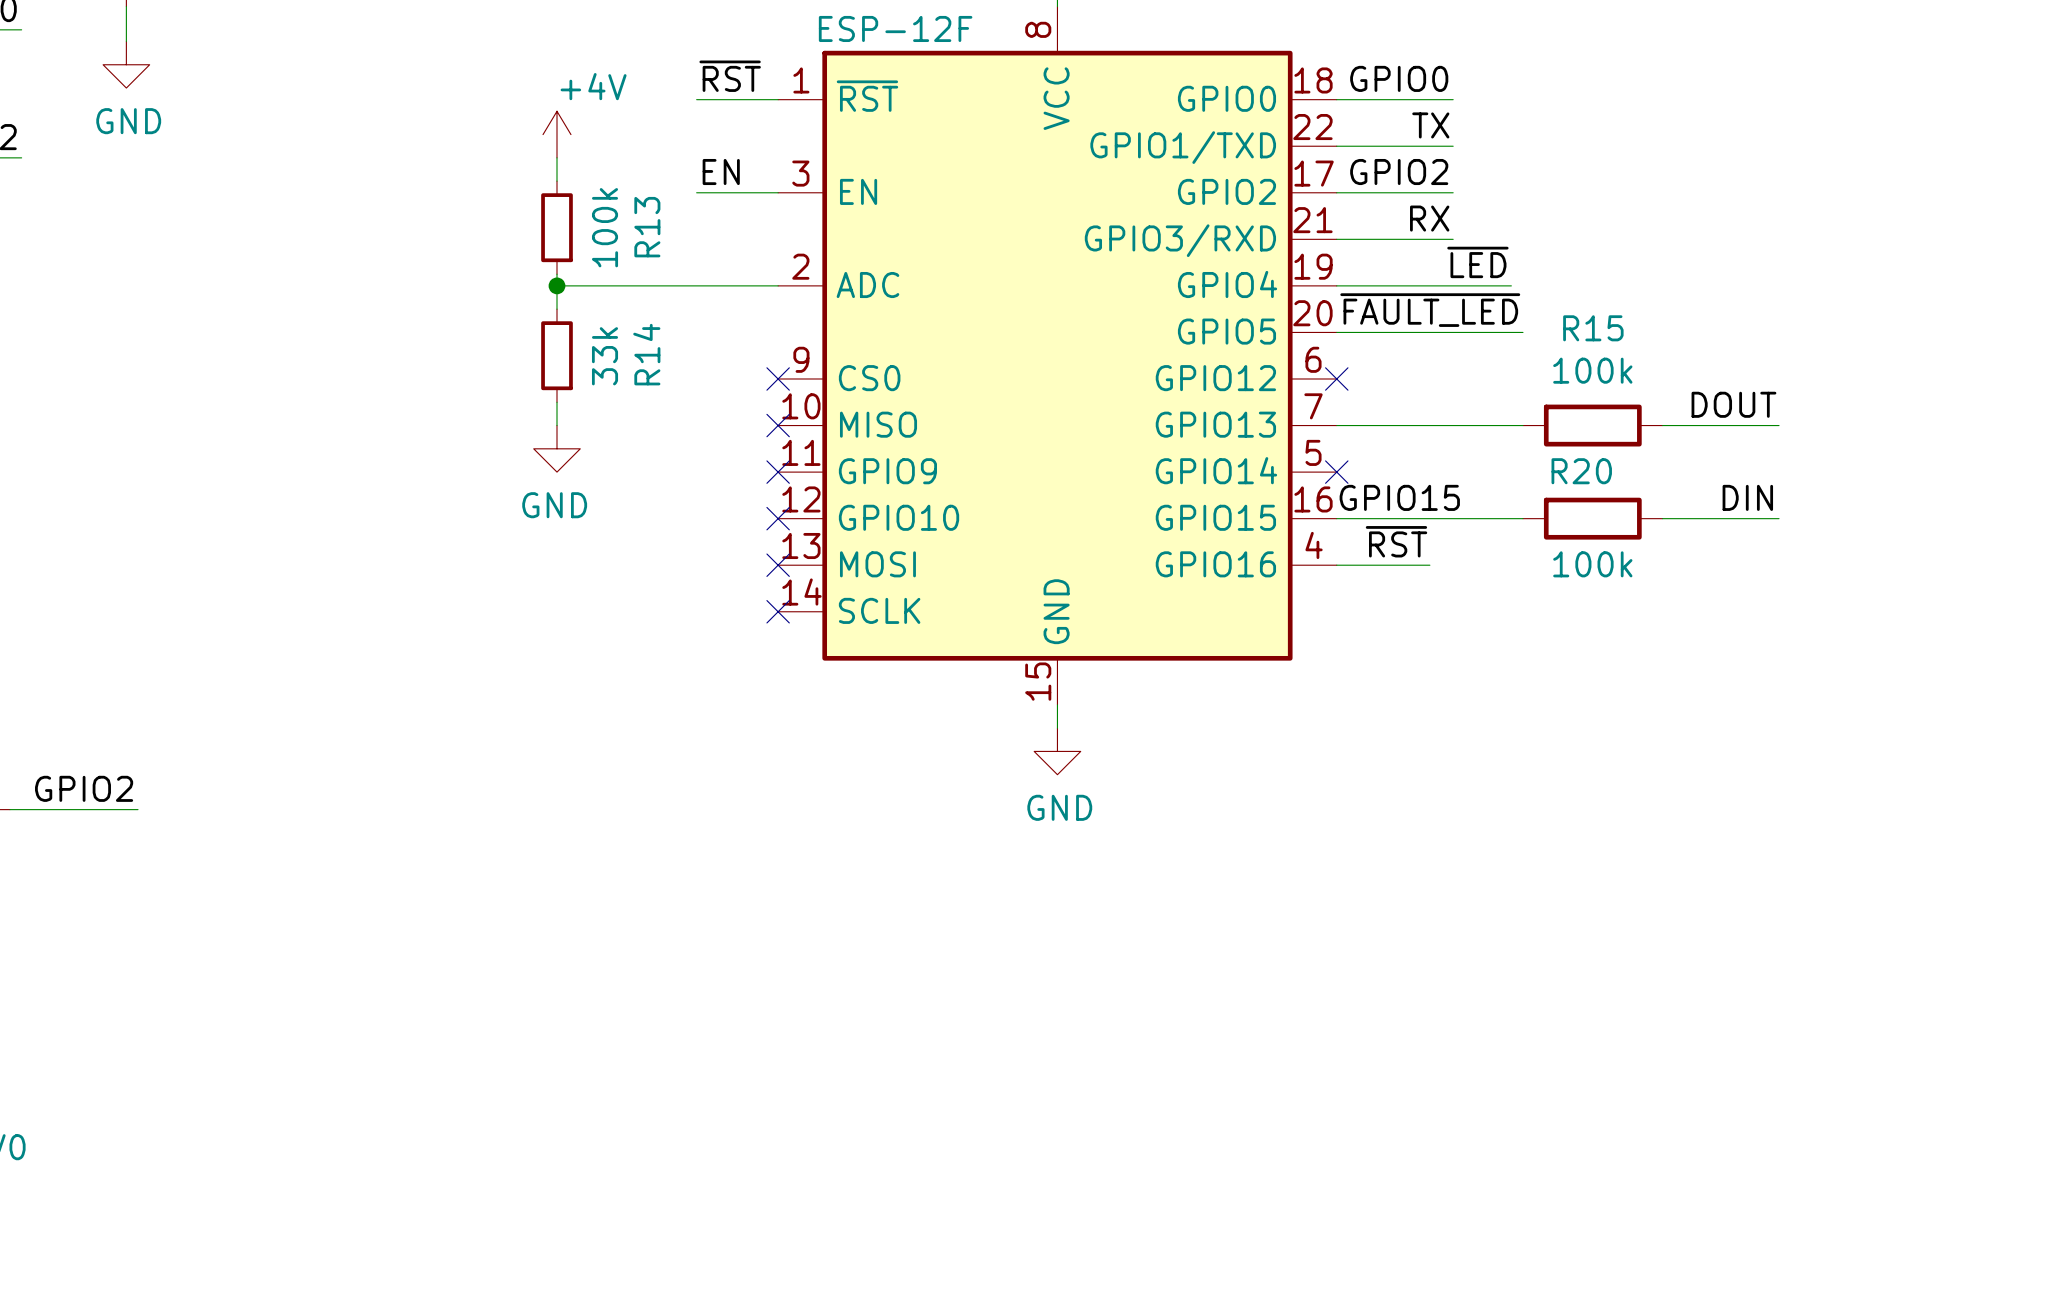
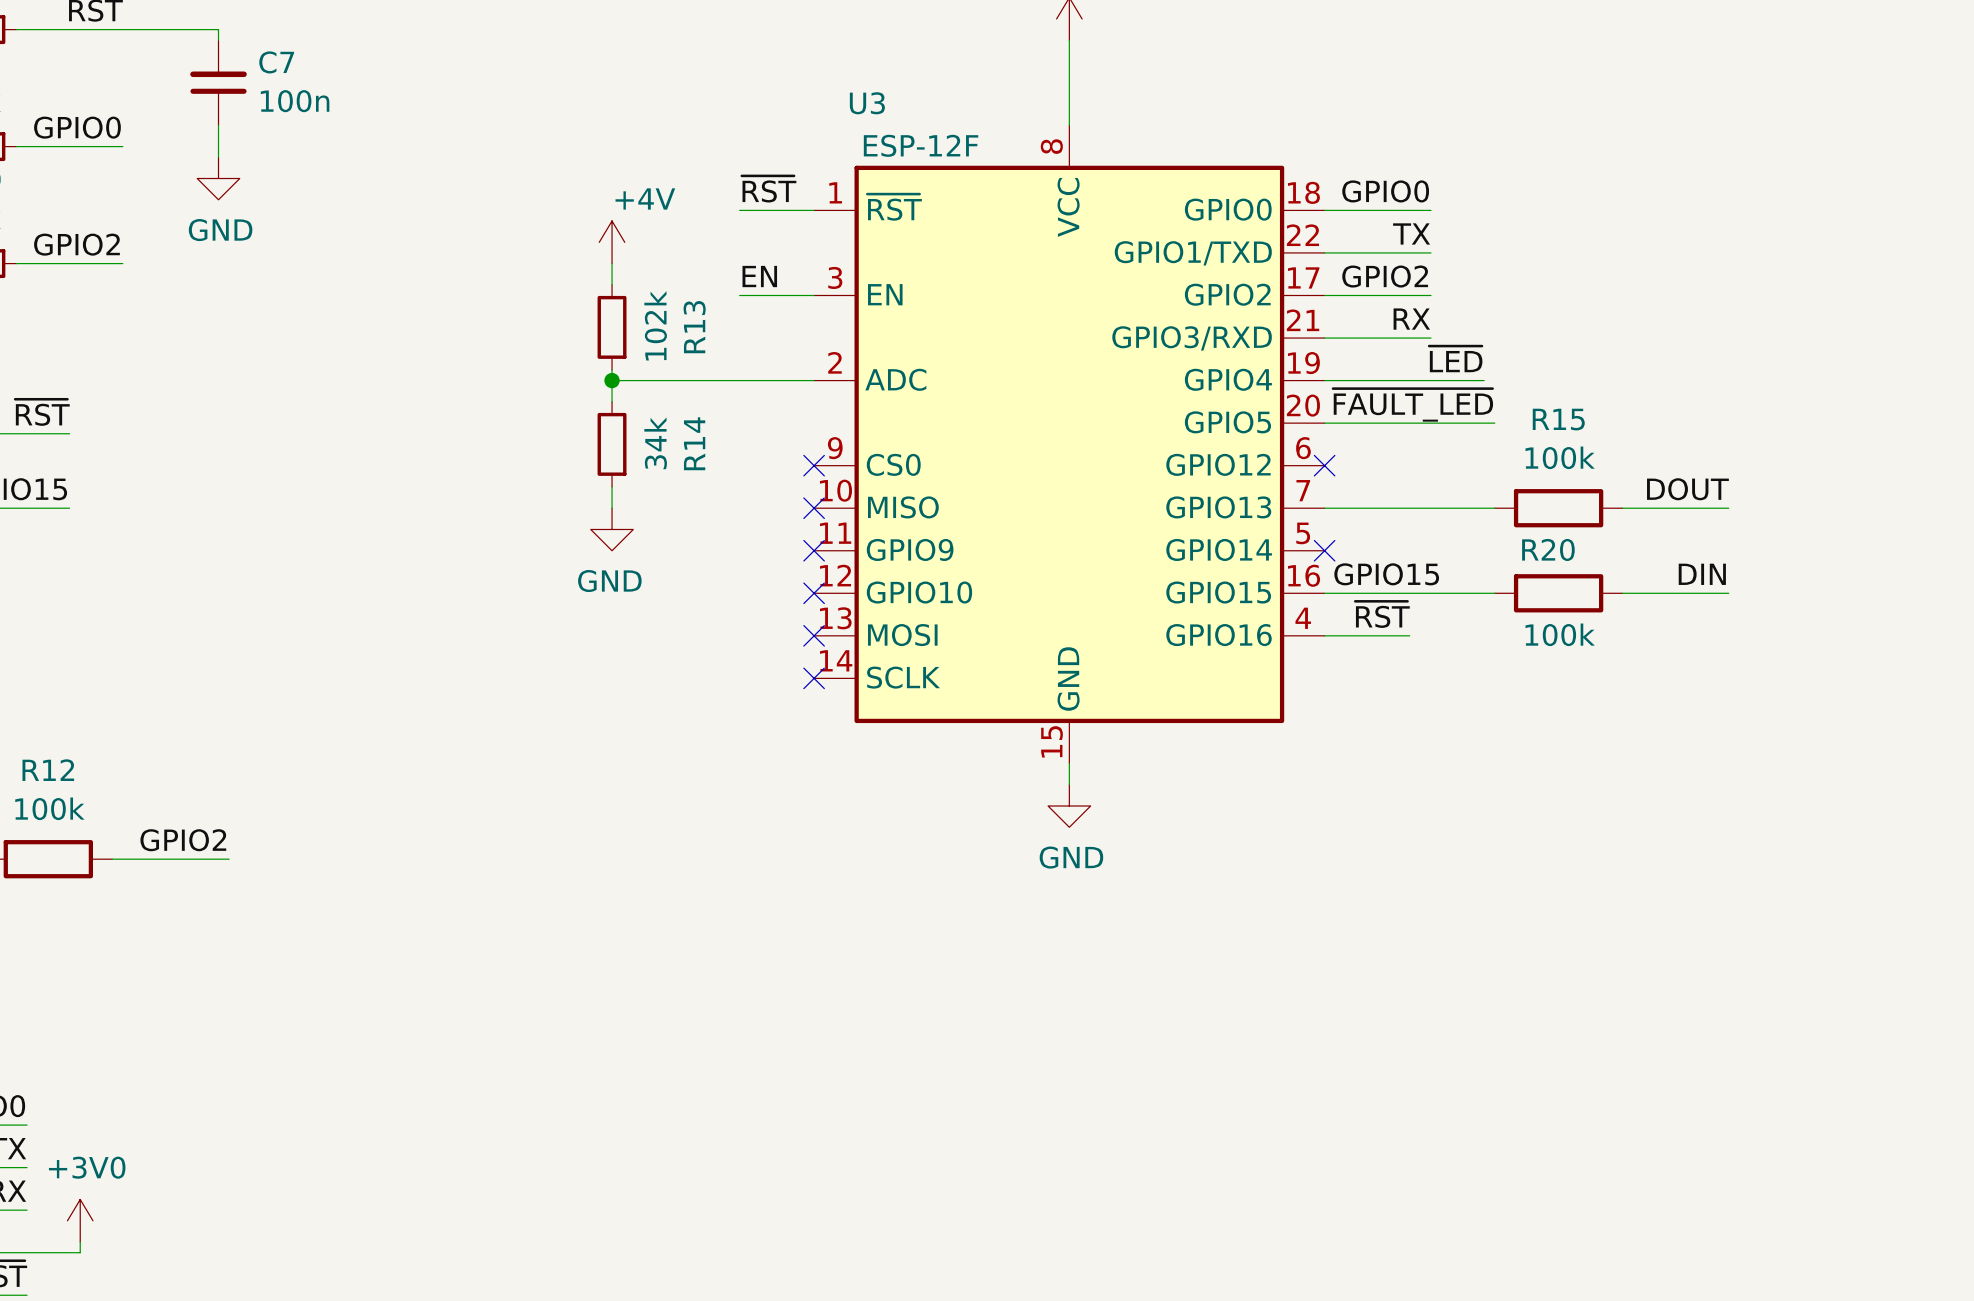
R13 value: 100k (605, 227) -> 102k (655, 325)
R14 value: 33k (605, 356) -> 34k (655, 443)

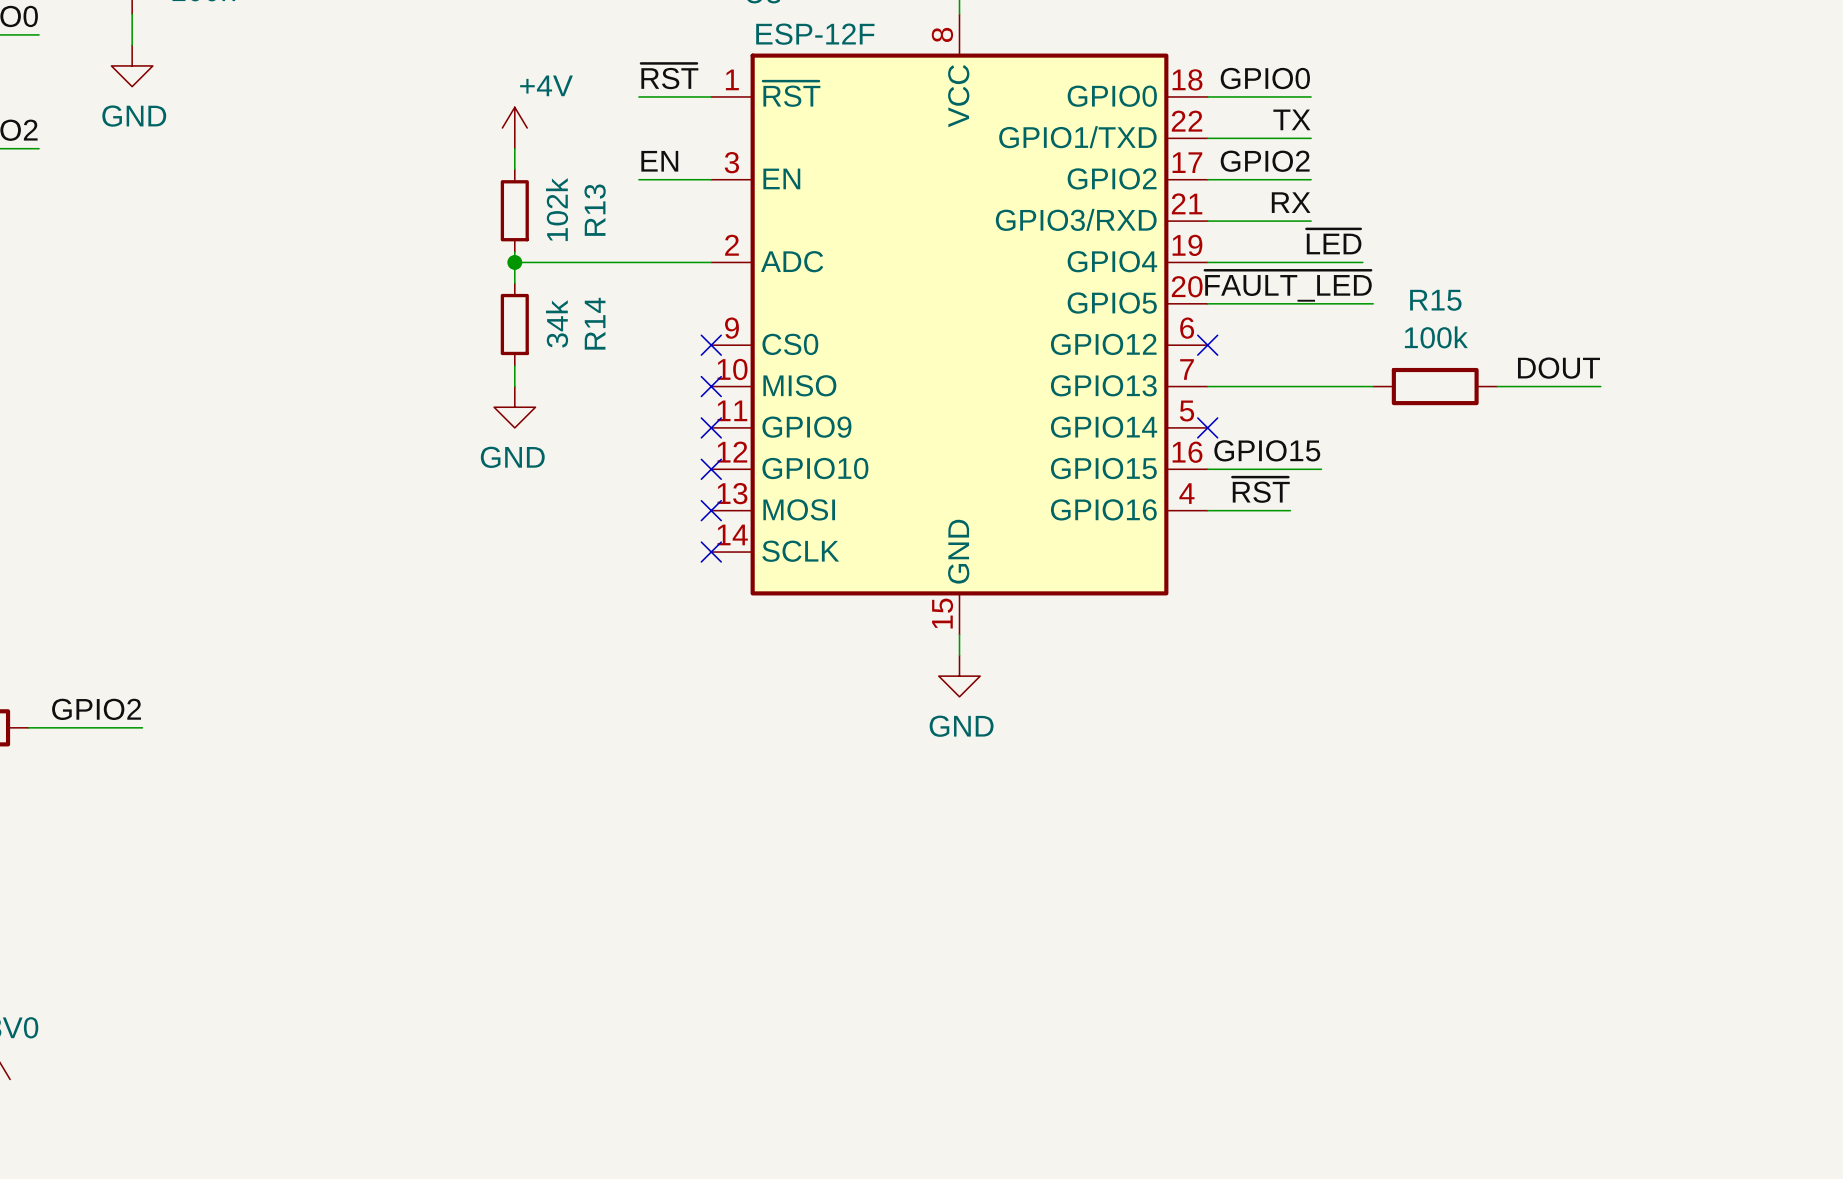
label: DIN (1702, 574) -> none
wire: (1441, 593) (1494, 593) -> none
R20: 100k (1558, 593) -> none
wire: (1622, 593) (1728, 593) -> none

